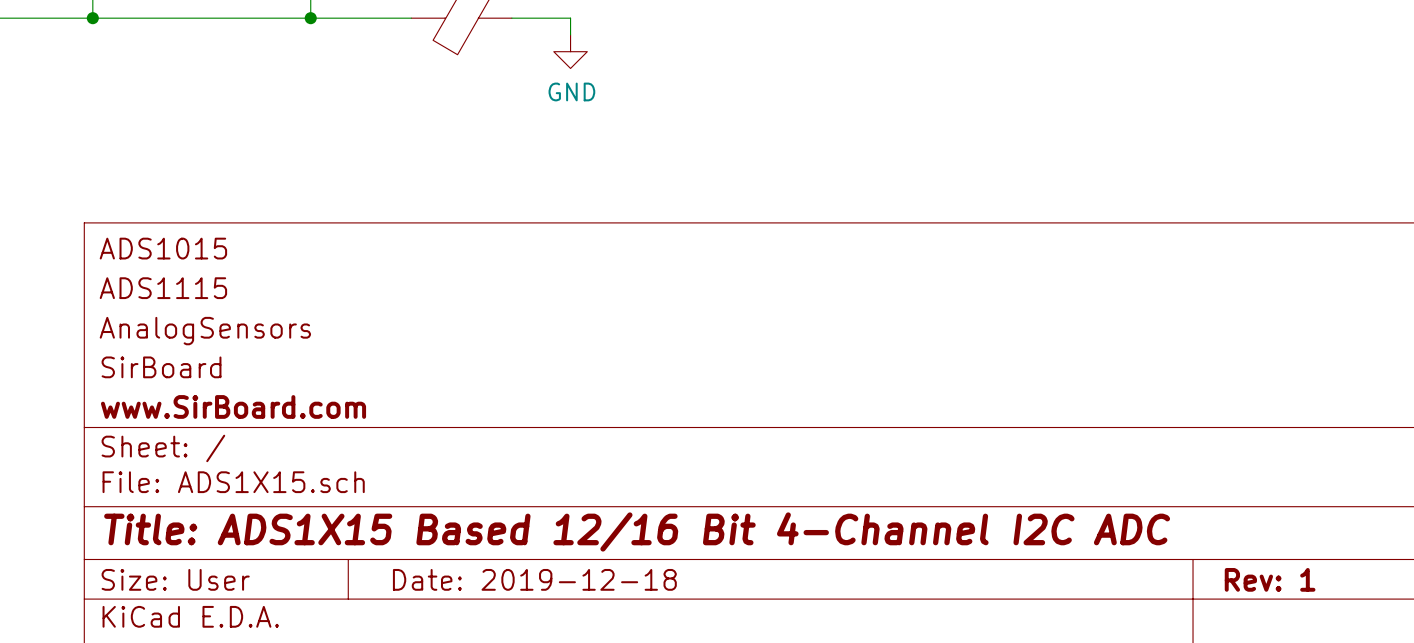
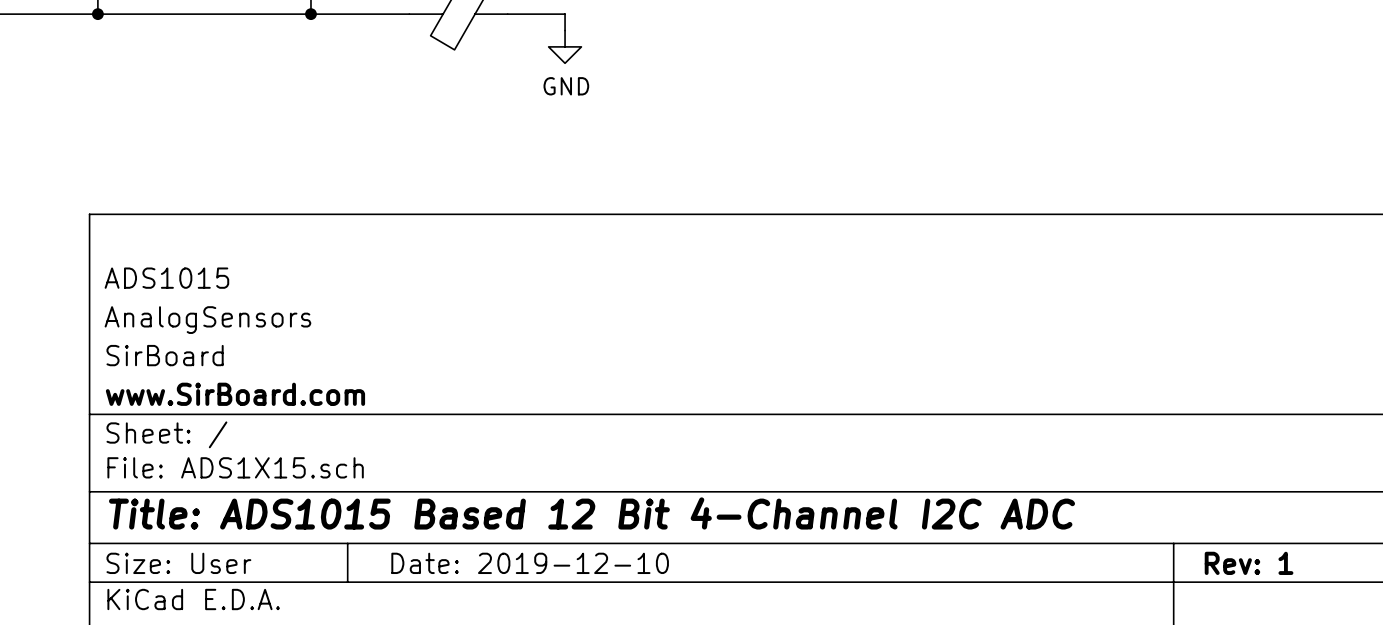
title block: ADS1015 (163, 248) -> none
title block: ADS1115 (163, 288) -> ADS1015 (166, 278)
title block: Title: ADS1X15 Based 12/16 Bit 4-Channel I2C ADC (637, 531) -> Title: ADS1015 Based 12 Bit 4-Channel I2C ADC (592, 513)
title block: Date: 2019-12-18 (534, 579) -> Date: 2019-12-10 (530, 563)

